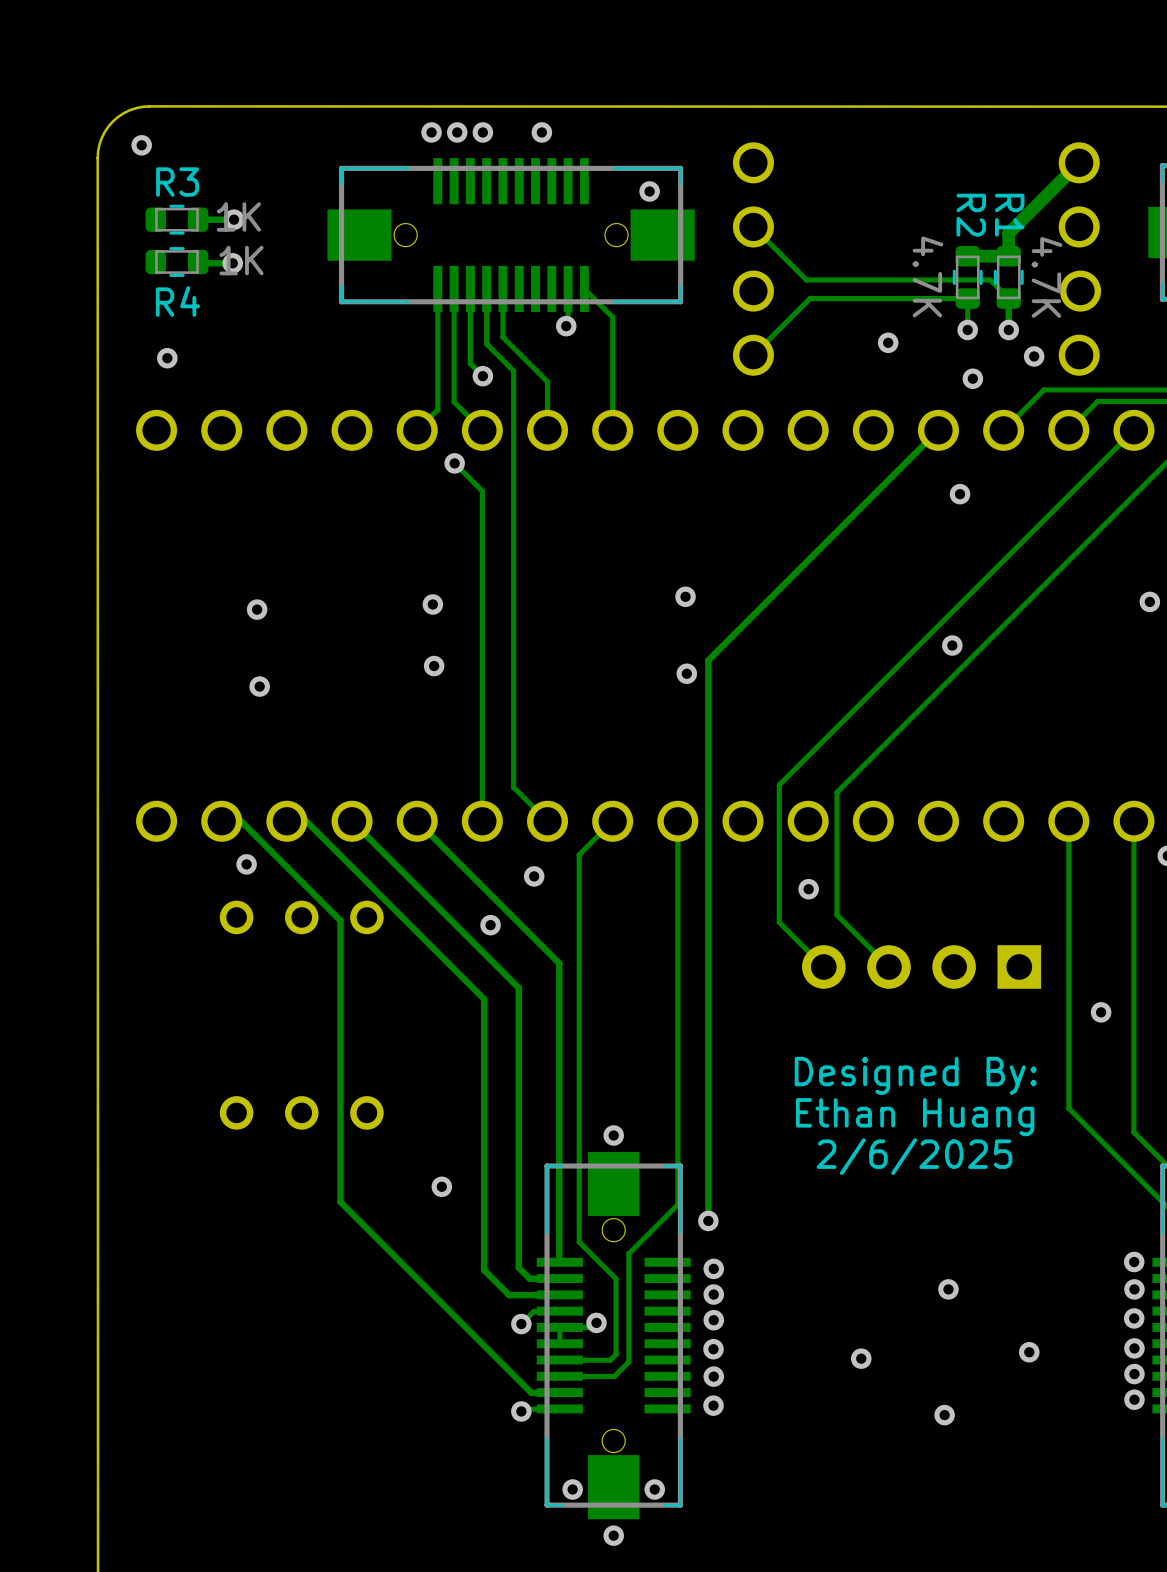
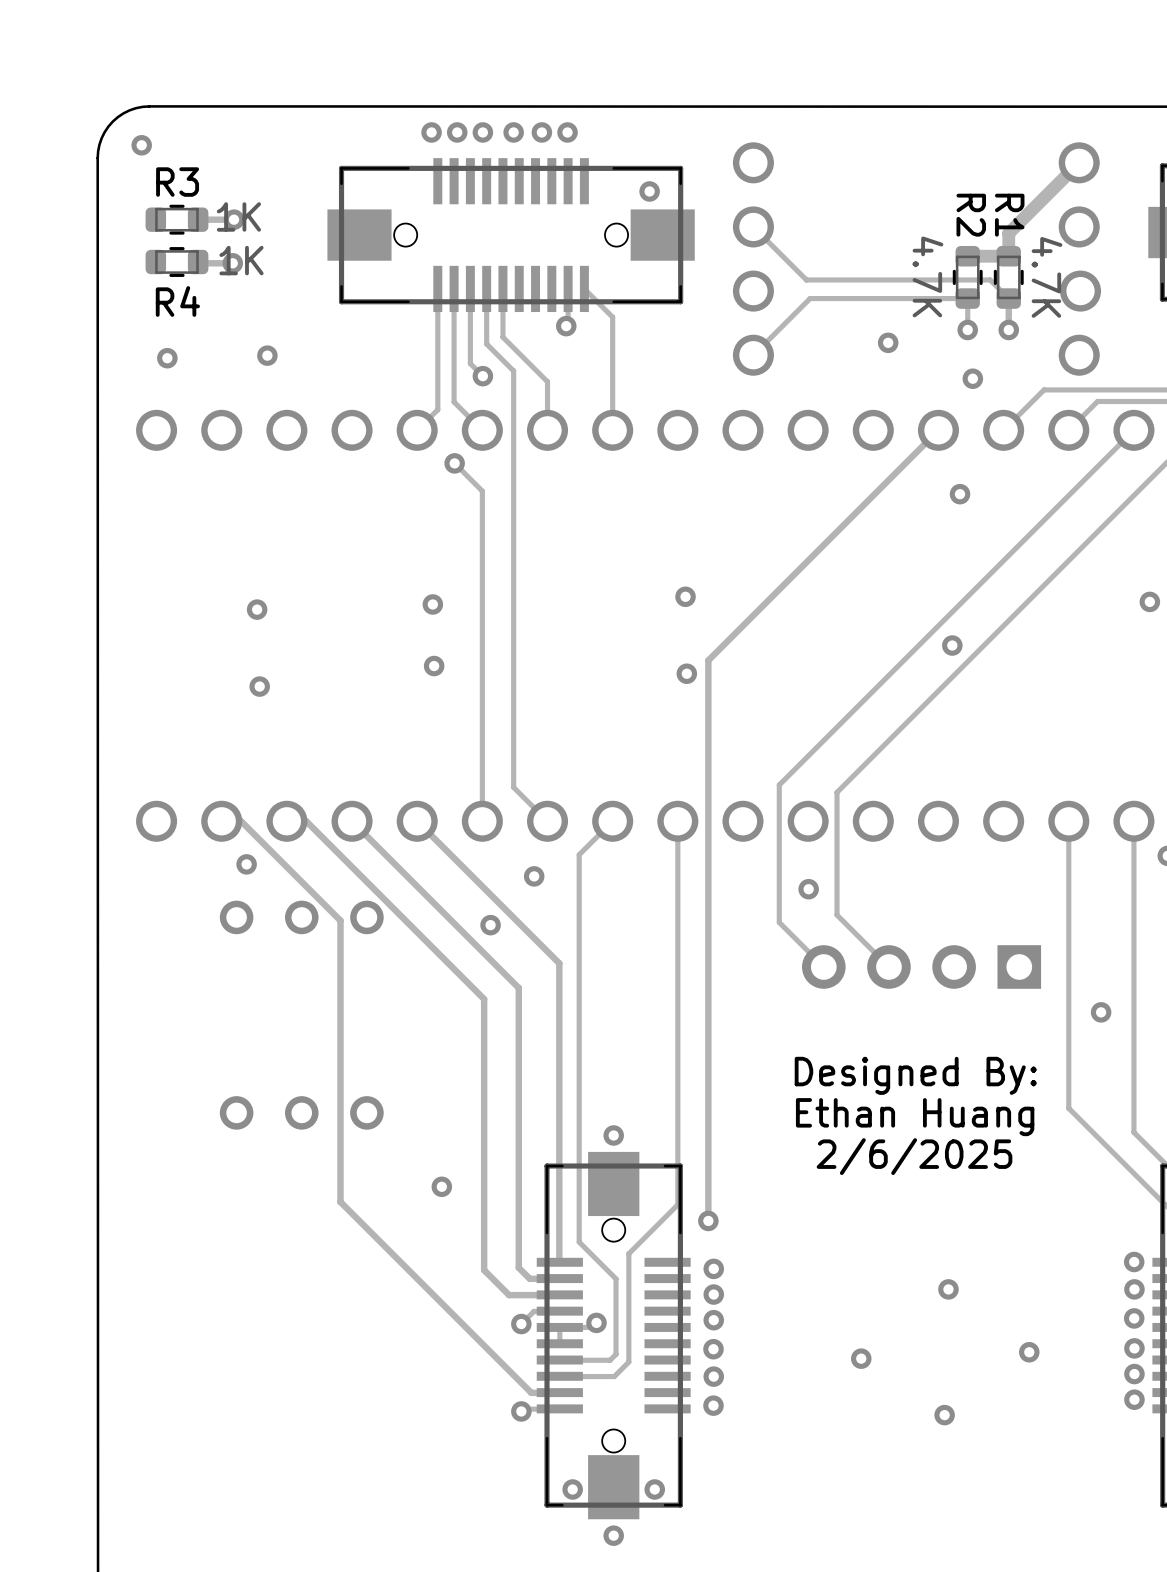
via: none -> (513, 132)
via: none -> (567, 132)
via: none -> (267, 355)
via: (1034, 356) -> none

